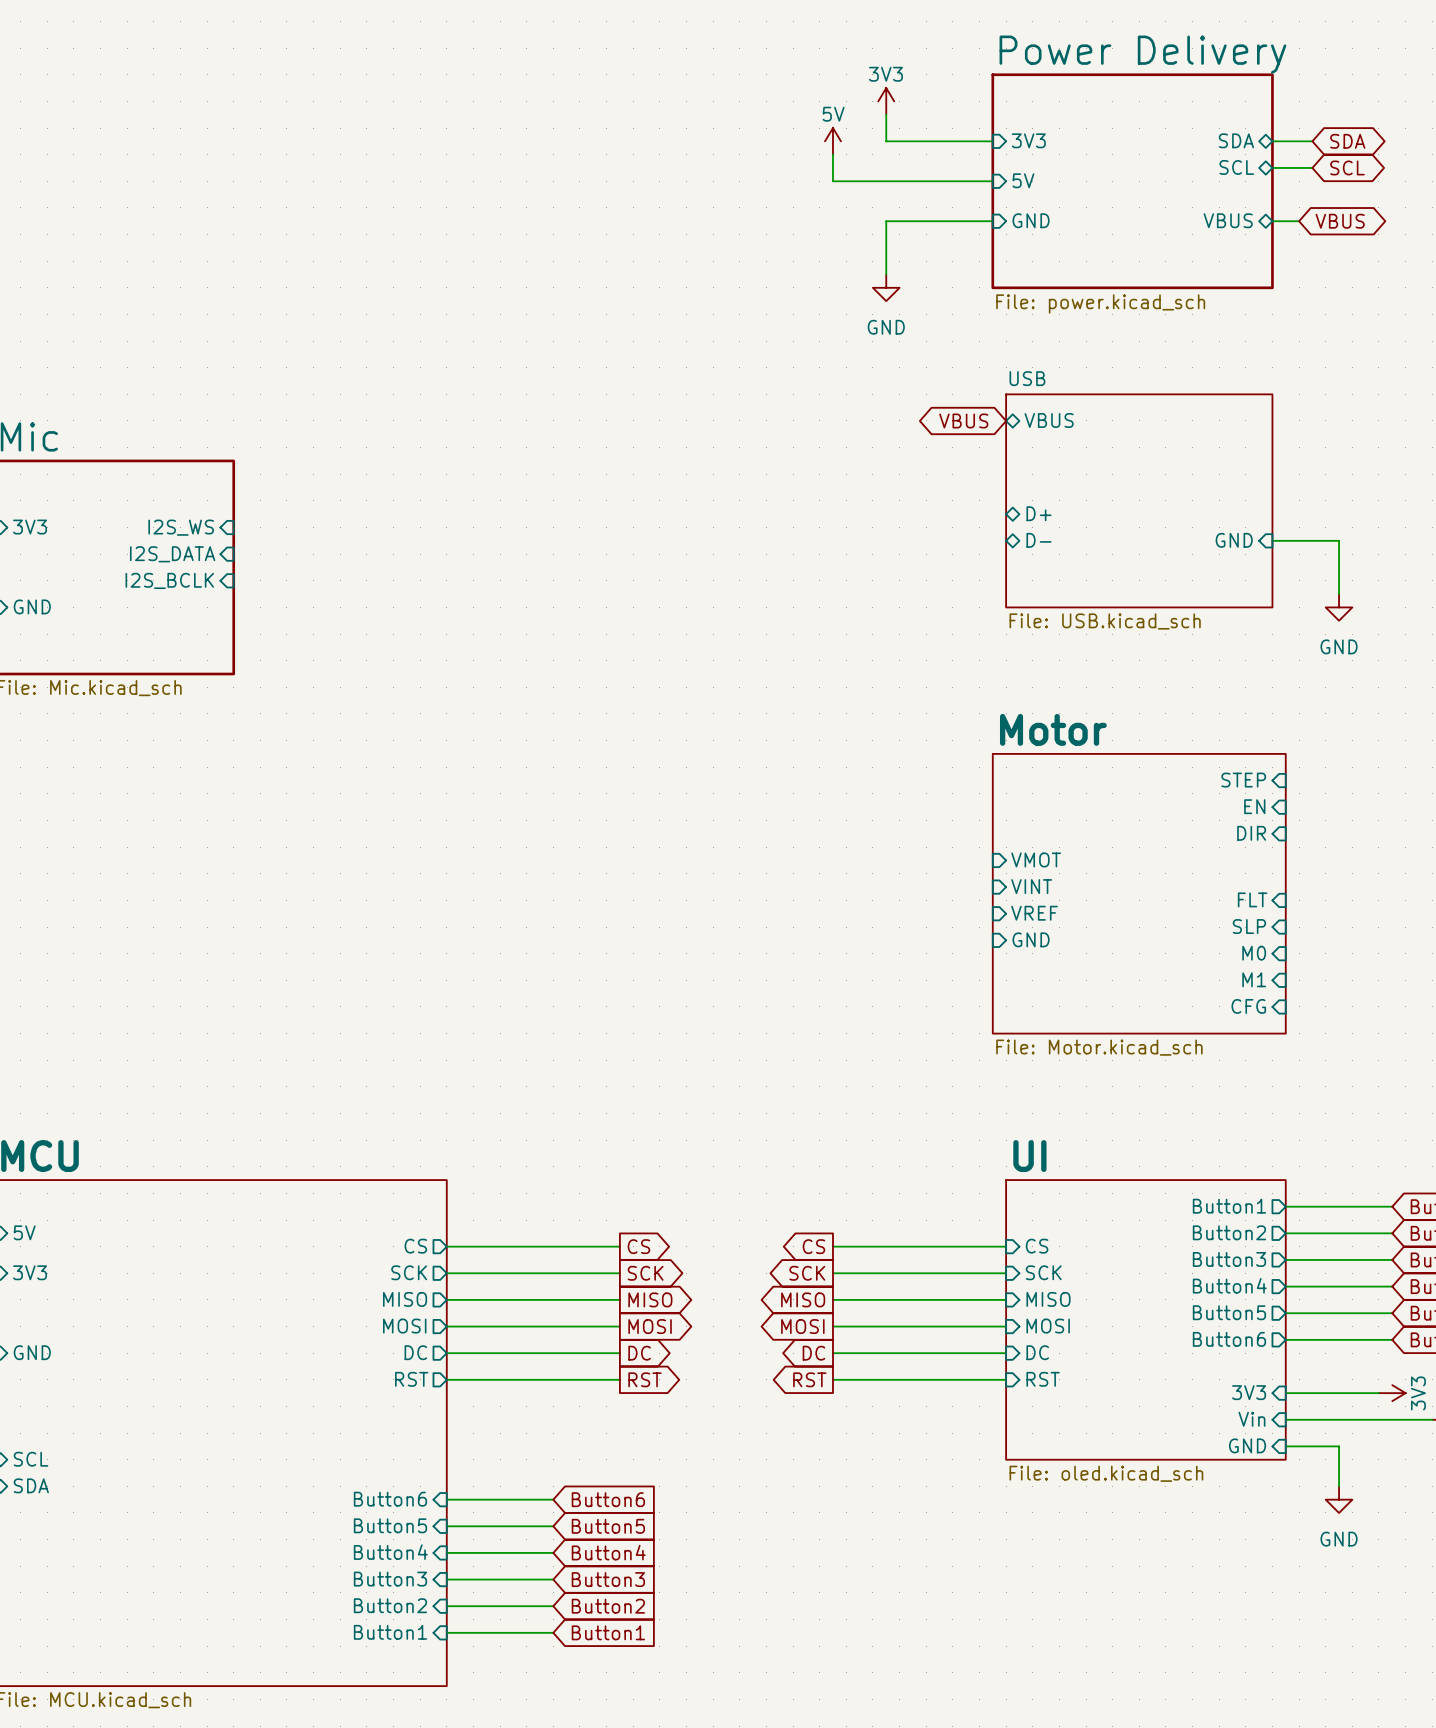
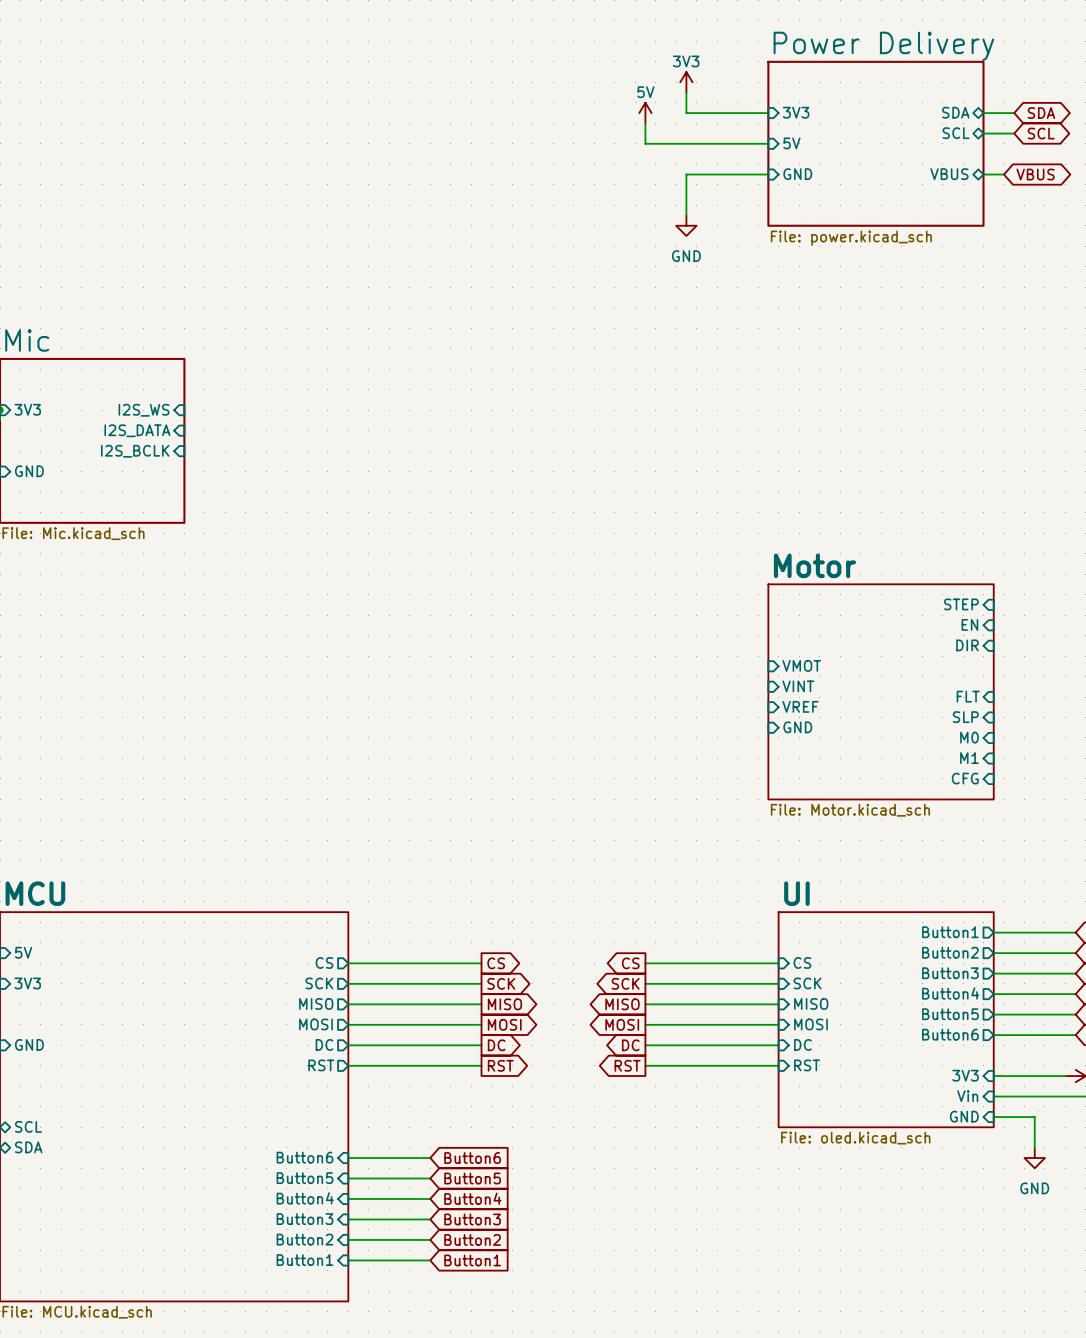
global label: VBUS (963, 420) -> none
sheet pin: VBUS (1049, 420) -> none
sheet USB: File: USB.kicad_sch (1139, 500) -> none
sheet pin: D+ (1038, 513) -> none
sheet pin: D- (1038, 540) -> none
sheet pin: GND (1234, 540) -> none
wire: (1272, 540) (1339, 540) (1339, 594) -> none
power symbol: GND (1339, 607) -> none

